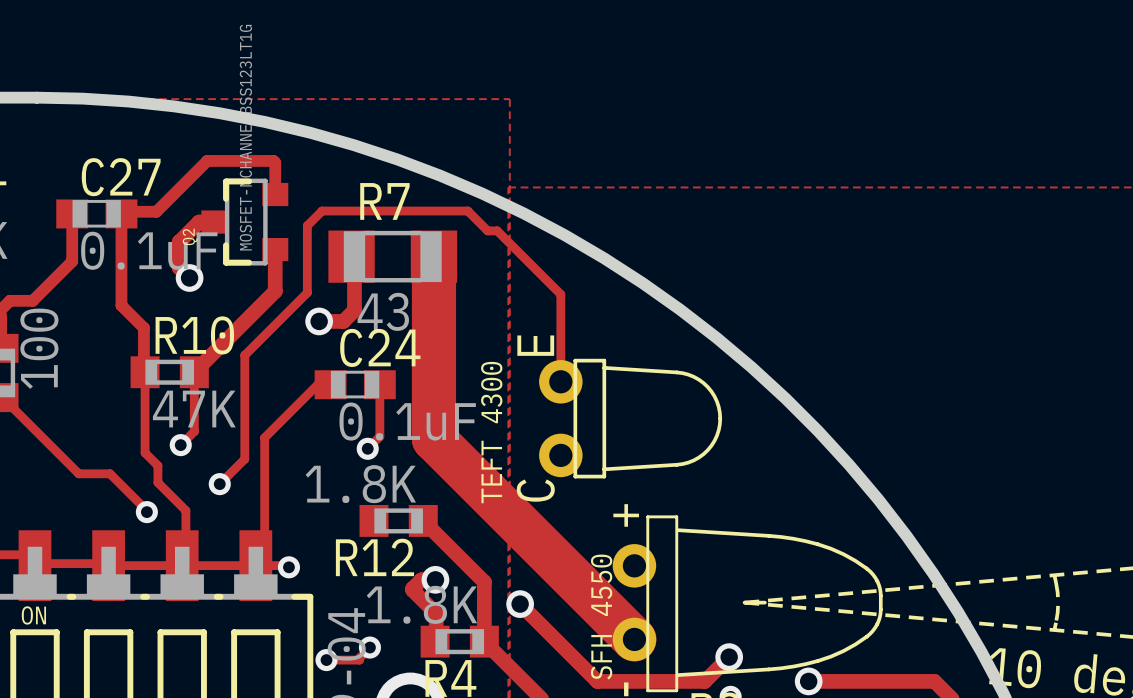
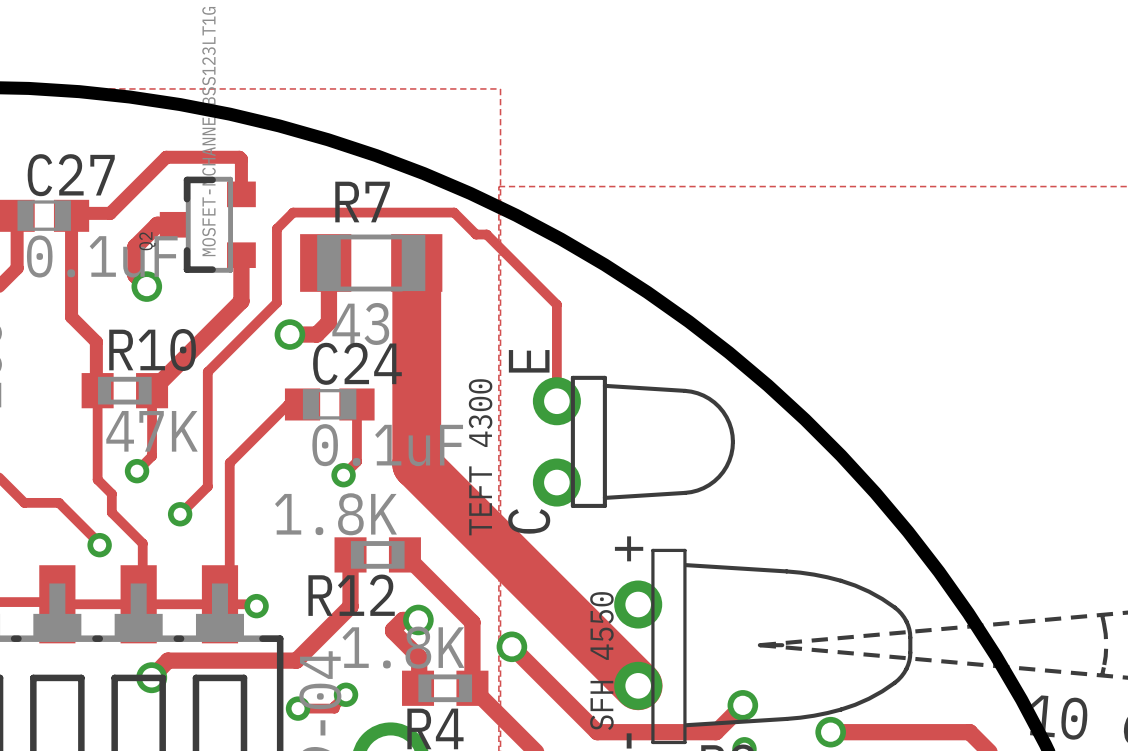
track: none -> (350, 554) (350, 606) (296, 660) (167, 660) (151, 677)
via: none -> (151, 677)

